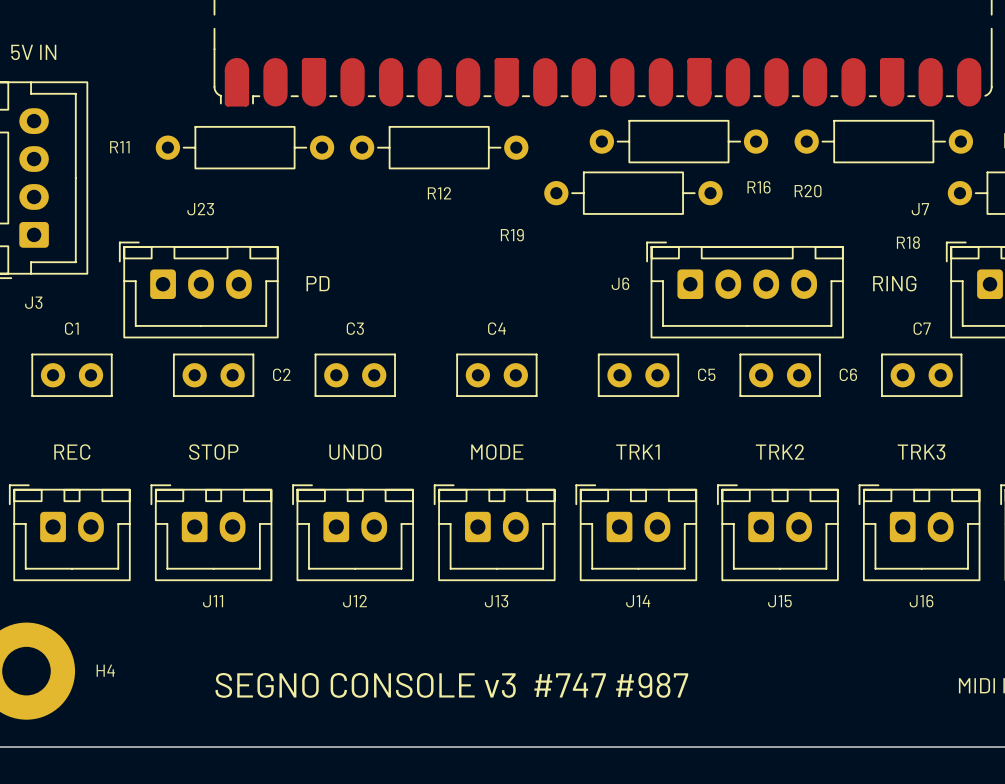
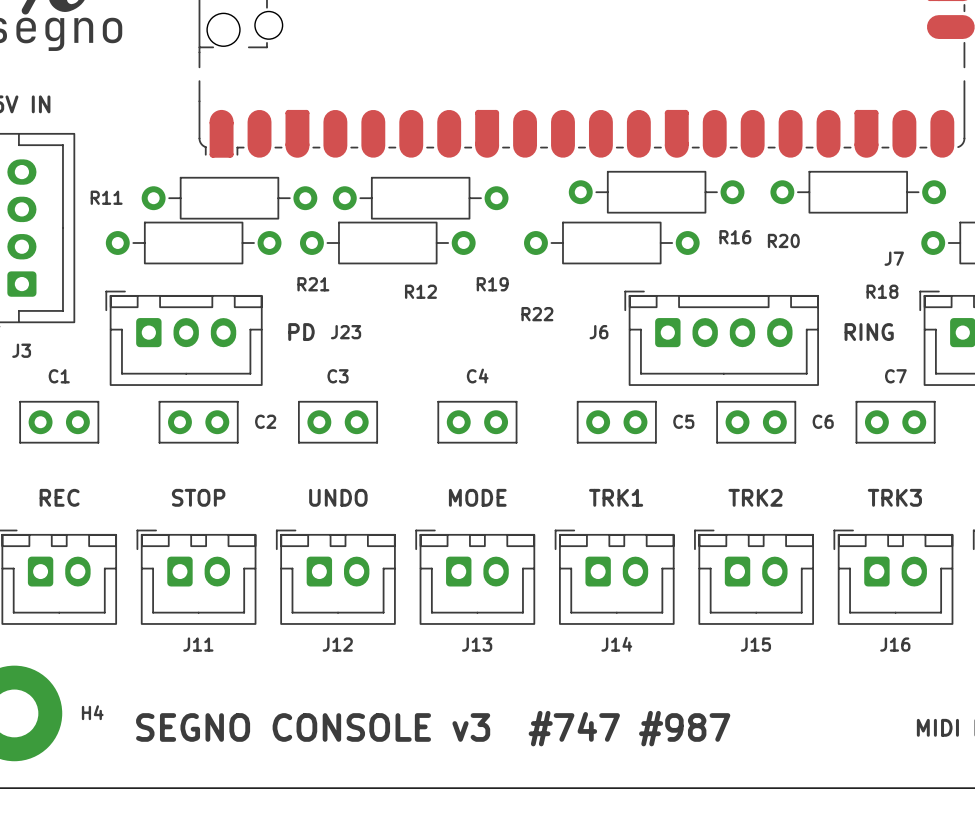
R21: none -> (193, 243)
R22: none -> (387, 243)
R12 name position: R12 (439, 193) -> R12 (420, 291)
J23 name position: J23 (200, 209) -> J23 (346, 332)

